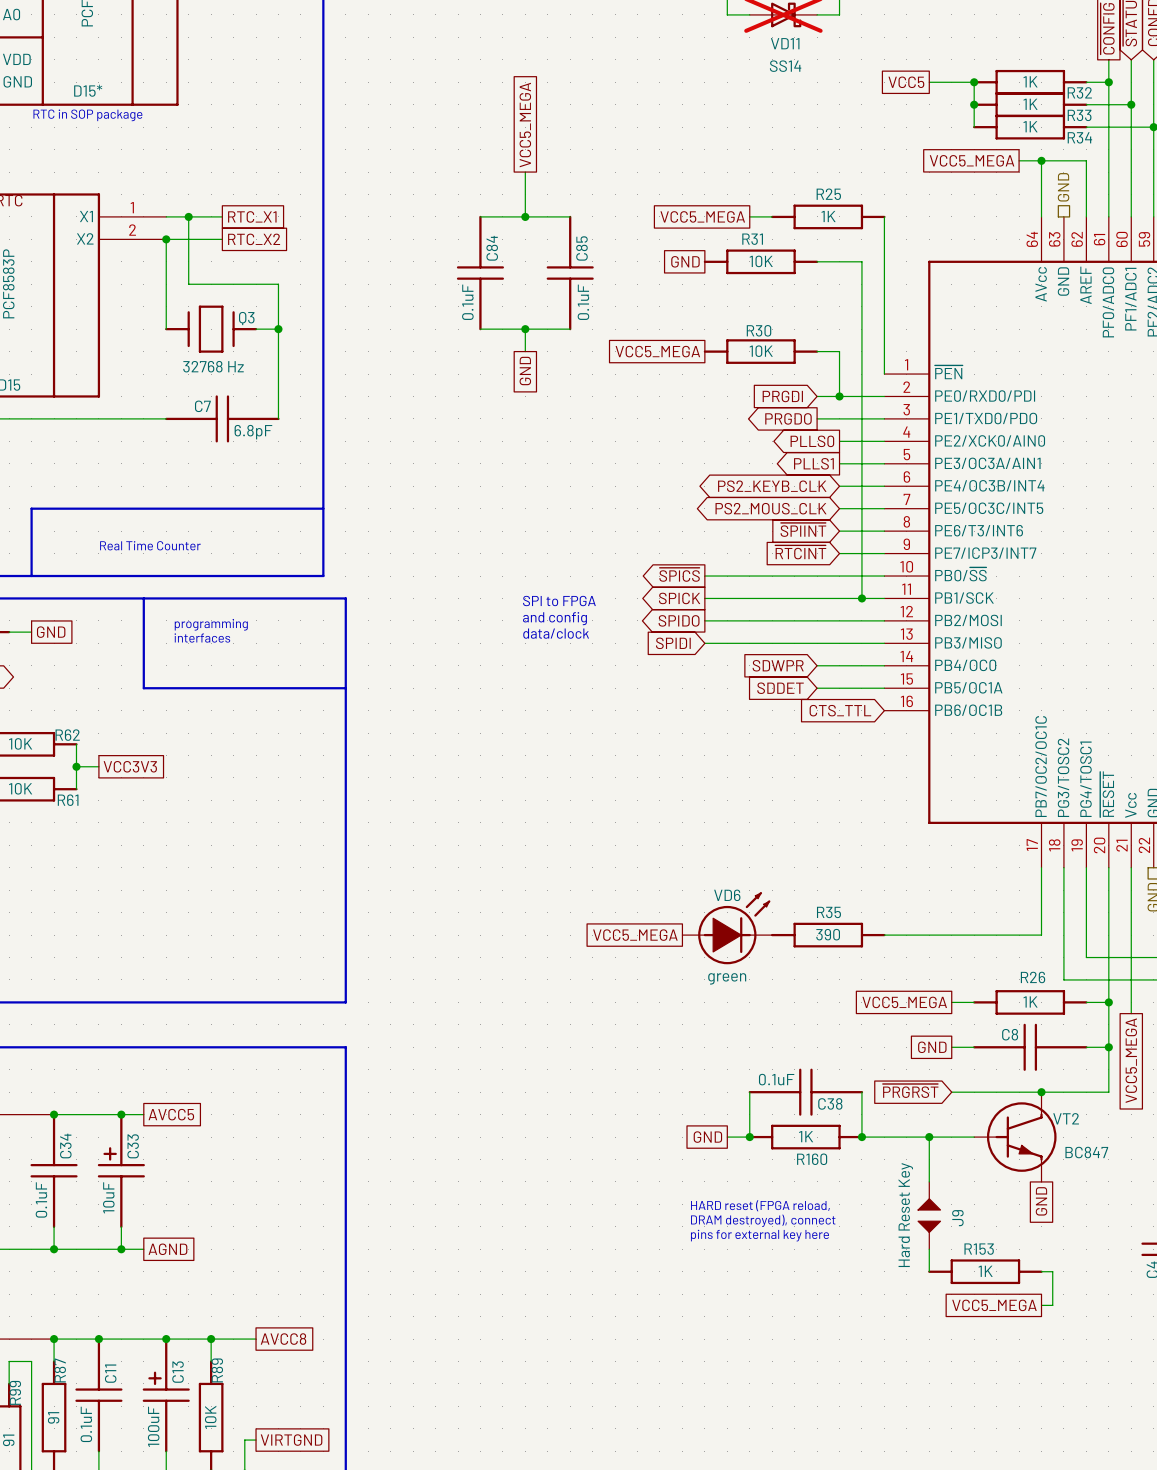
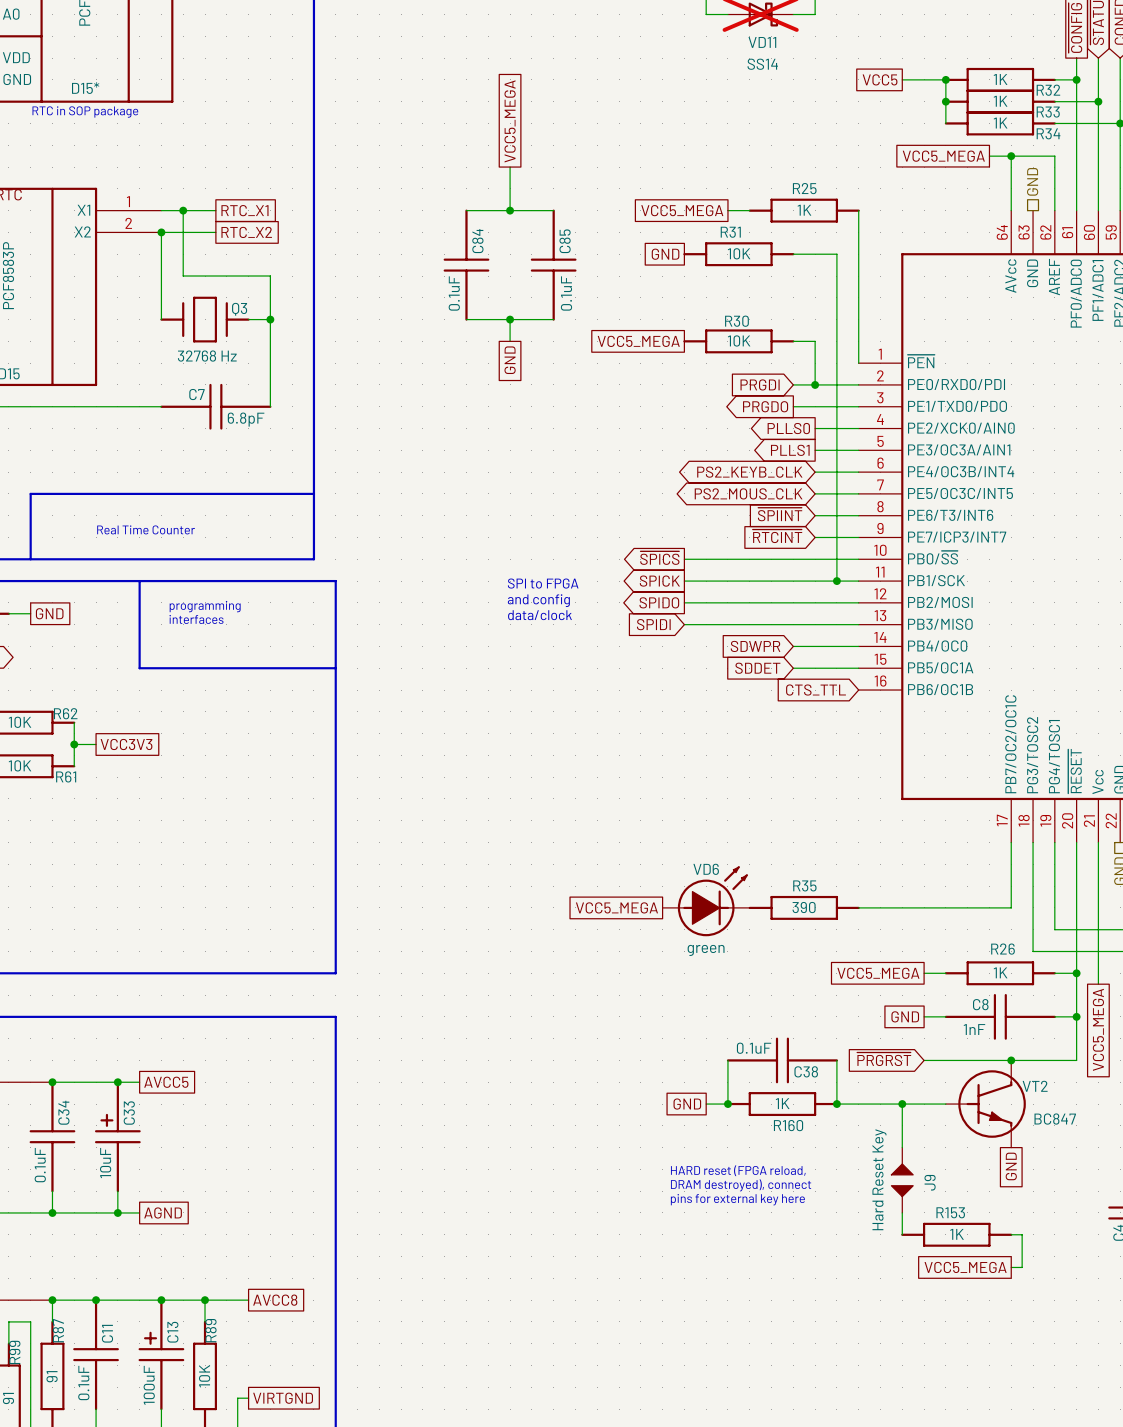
C8 value: none -> 1nF (974, 1029)

